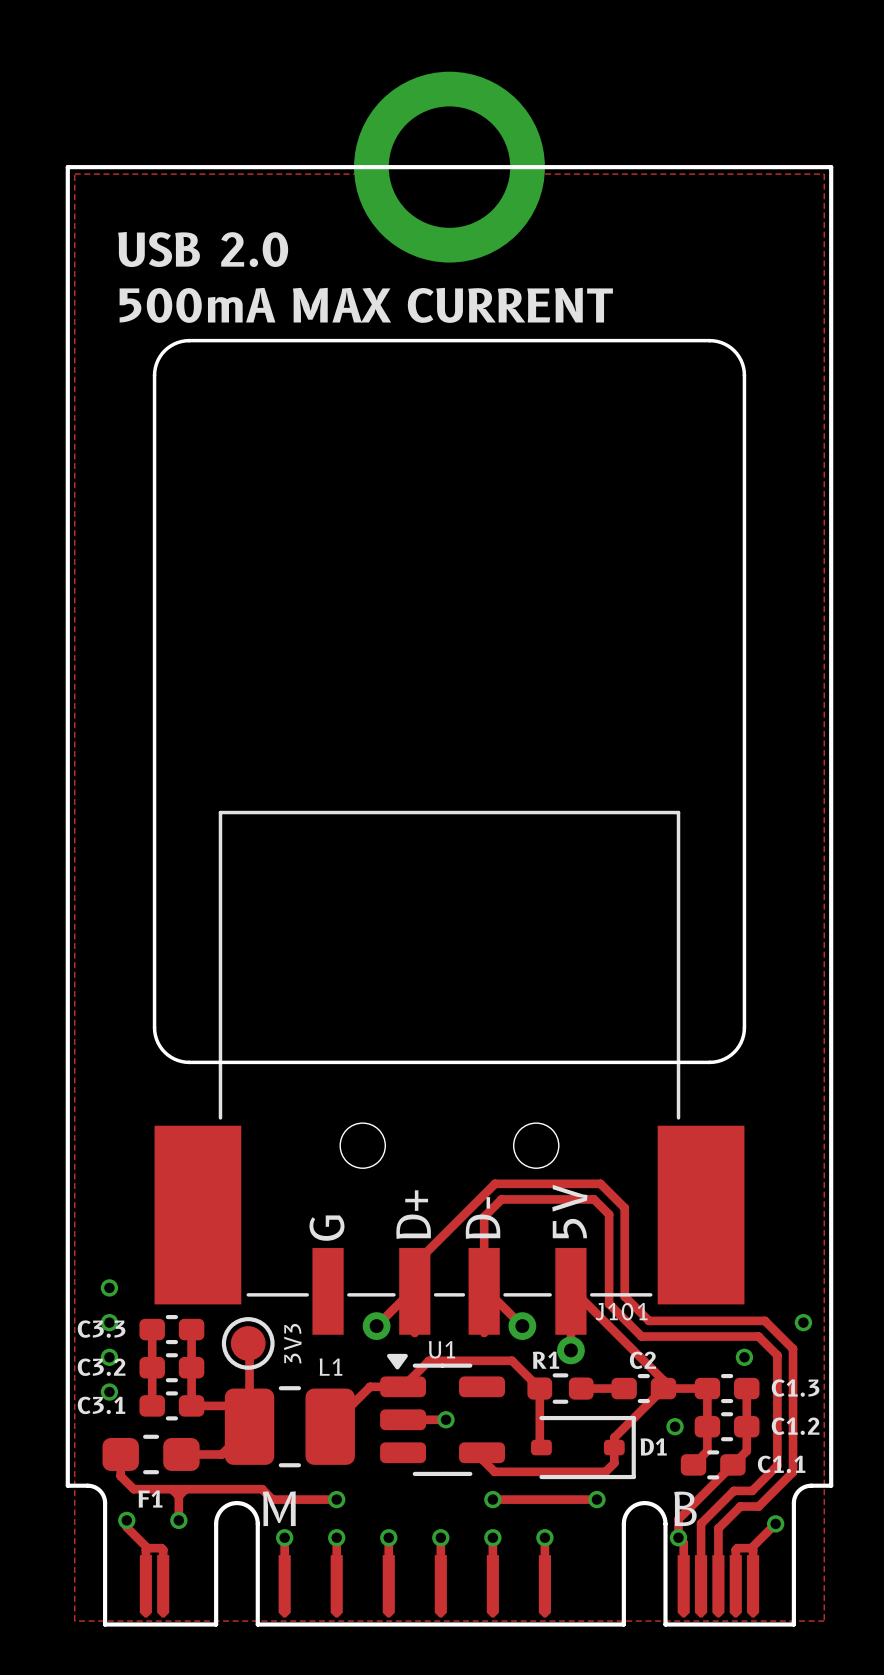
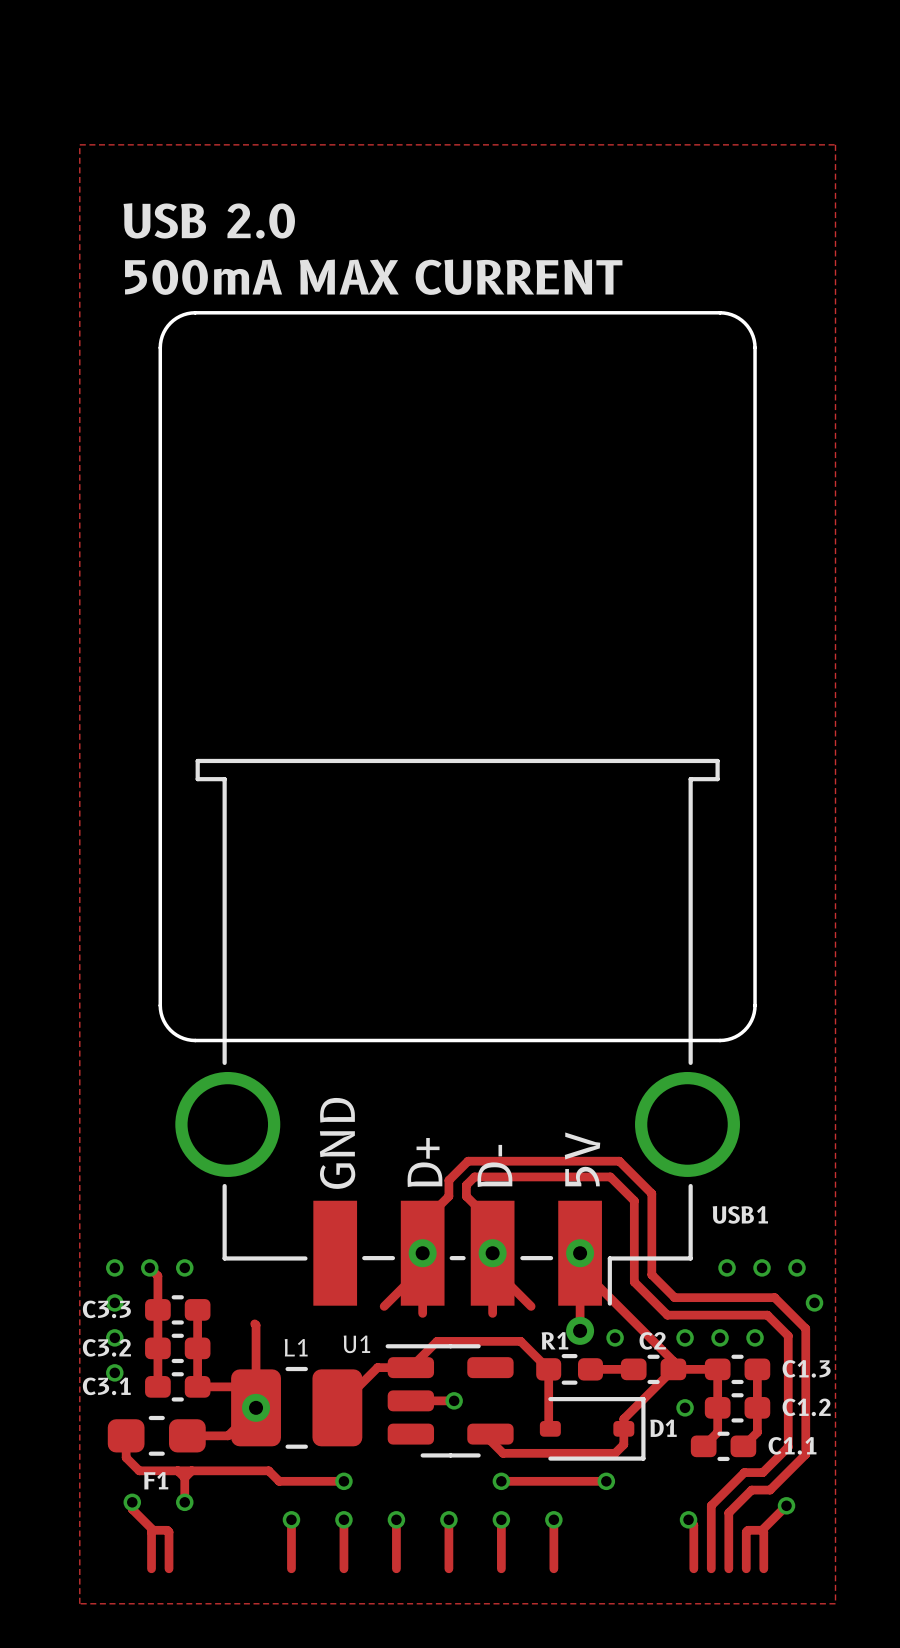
part: (449, 849) -> none
USB1: none -> (457, 1032)
J101: (449, 1072) -> none
text position: 5V (569, 1211) -> 5V (582, 1159)
text position: D+ (413, 1214) -> D+ (424, 1162)
text position: D- (483, 1218) -> D- (494, 1165)
track: (624, 1221) (624, 1207) (600, 1183) (495, 1183) (418, 1260) (414, 1260) -> (634, 1200) (610, 1176) (474, 1176) (466, 1185) (466, 1196) (492, 1222)
text: G (326, 1228) -> GND (337, 1143)
track: (484, 1242) (484, 1216) (501, 1199) (594, 1199) (609, 1214) (609, 1304) (641, 1336) (758, 1336) -> (634, 1276) (634, 1282) (667, 1315) (767, 1315) (769, 1316)
via: none -> (422, 1253)
via: none -> (492, 1253)
via: none -> (580, 1253)
track: none -> (149, 1267) (157, 1276) (157, 1309)
via: none -> (149, 1267)
via: none -> (184, 1267)
via: none -> (727, 1267)
via: none -> (762, 1267)
via: none -> (797, 1267)
track: (624, 1296) (649, 1320) (764, 1320) (793, 1348) (793, 1472) (758, 1506) (740, 1506) (718, 1528) (718, 1530) -> (422, 1253) (422, 1222) (448, 1196) (448, 1180) (468, 1161) (619, 1161) (651, 1193) (651, 1274) (674, 1297) (774, 1297) (805, 1328) (805, 1454) (770, 1490) (751, 1490) (728, 1512)
via: (376, 1326) -> none
via: (522, 1326) -> none
part: (248, 1343) -> none
U1 name position: U1 (441, 1349) -> U1 (356, 1344)
U1 footprint: [380, 1353, 506, 1477] -> [385, 1344, 514, 1458]
via: none -> (615, 1337)
via: none -> (685, 1337)
via: none -> (720, 1337)
L1 name position: L1 (331, 1367) -> L1 (296, 1347)
via: none -> (256, 1407)
track: (732, 1464) (678, 1519) (678, 1537) -> none

